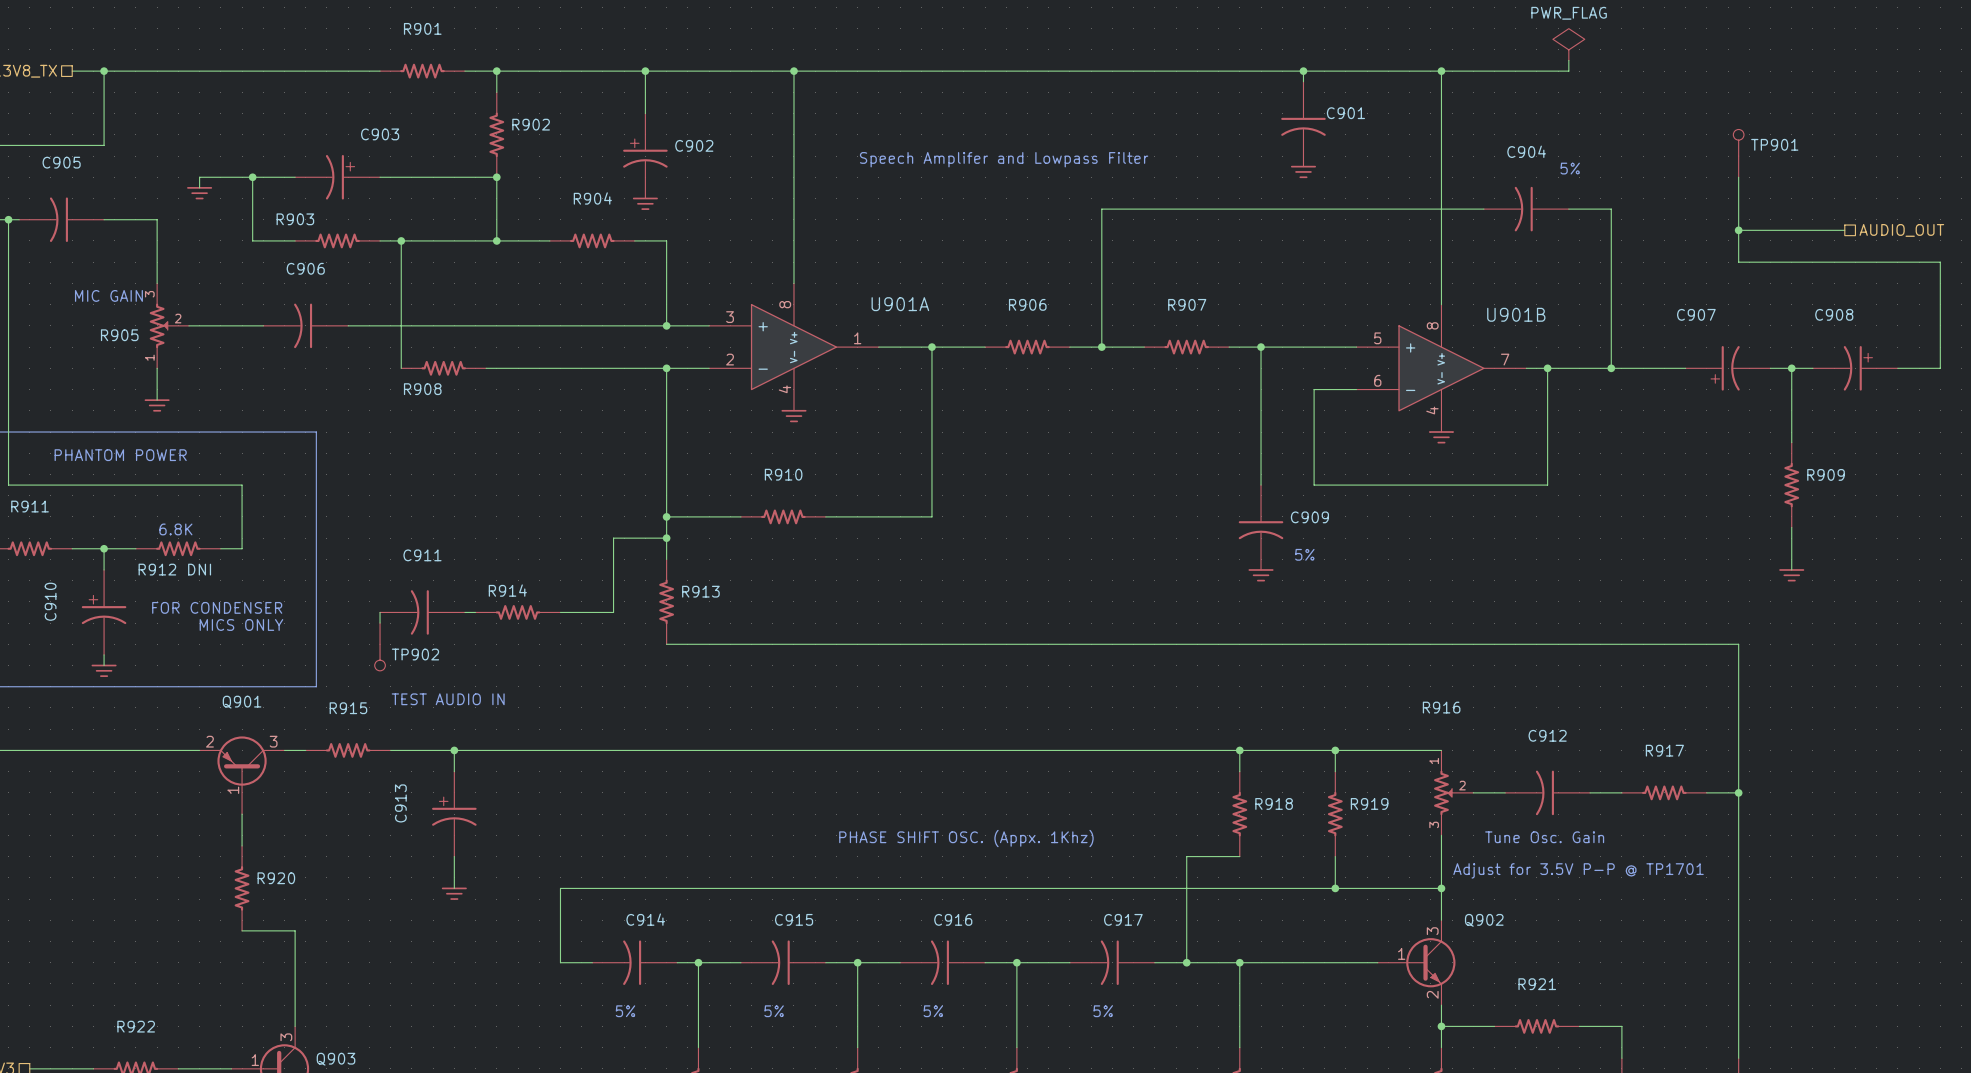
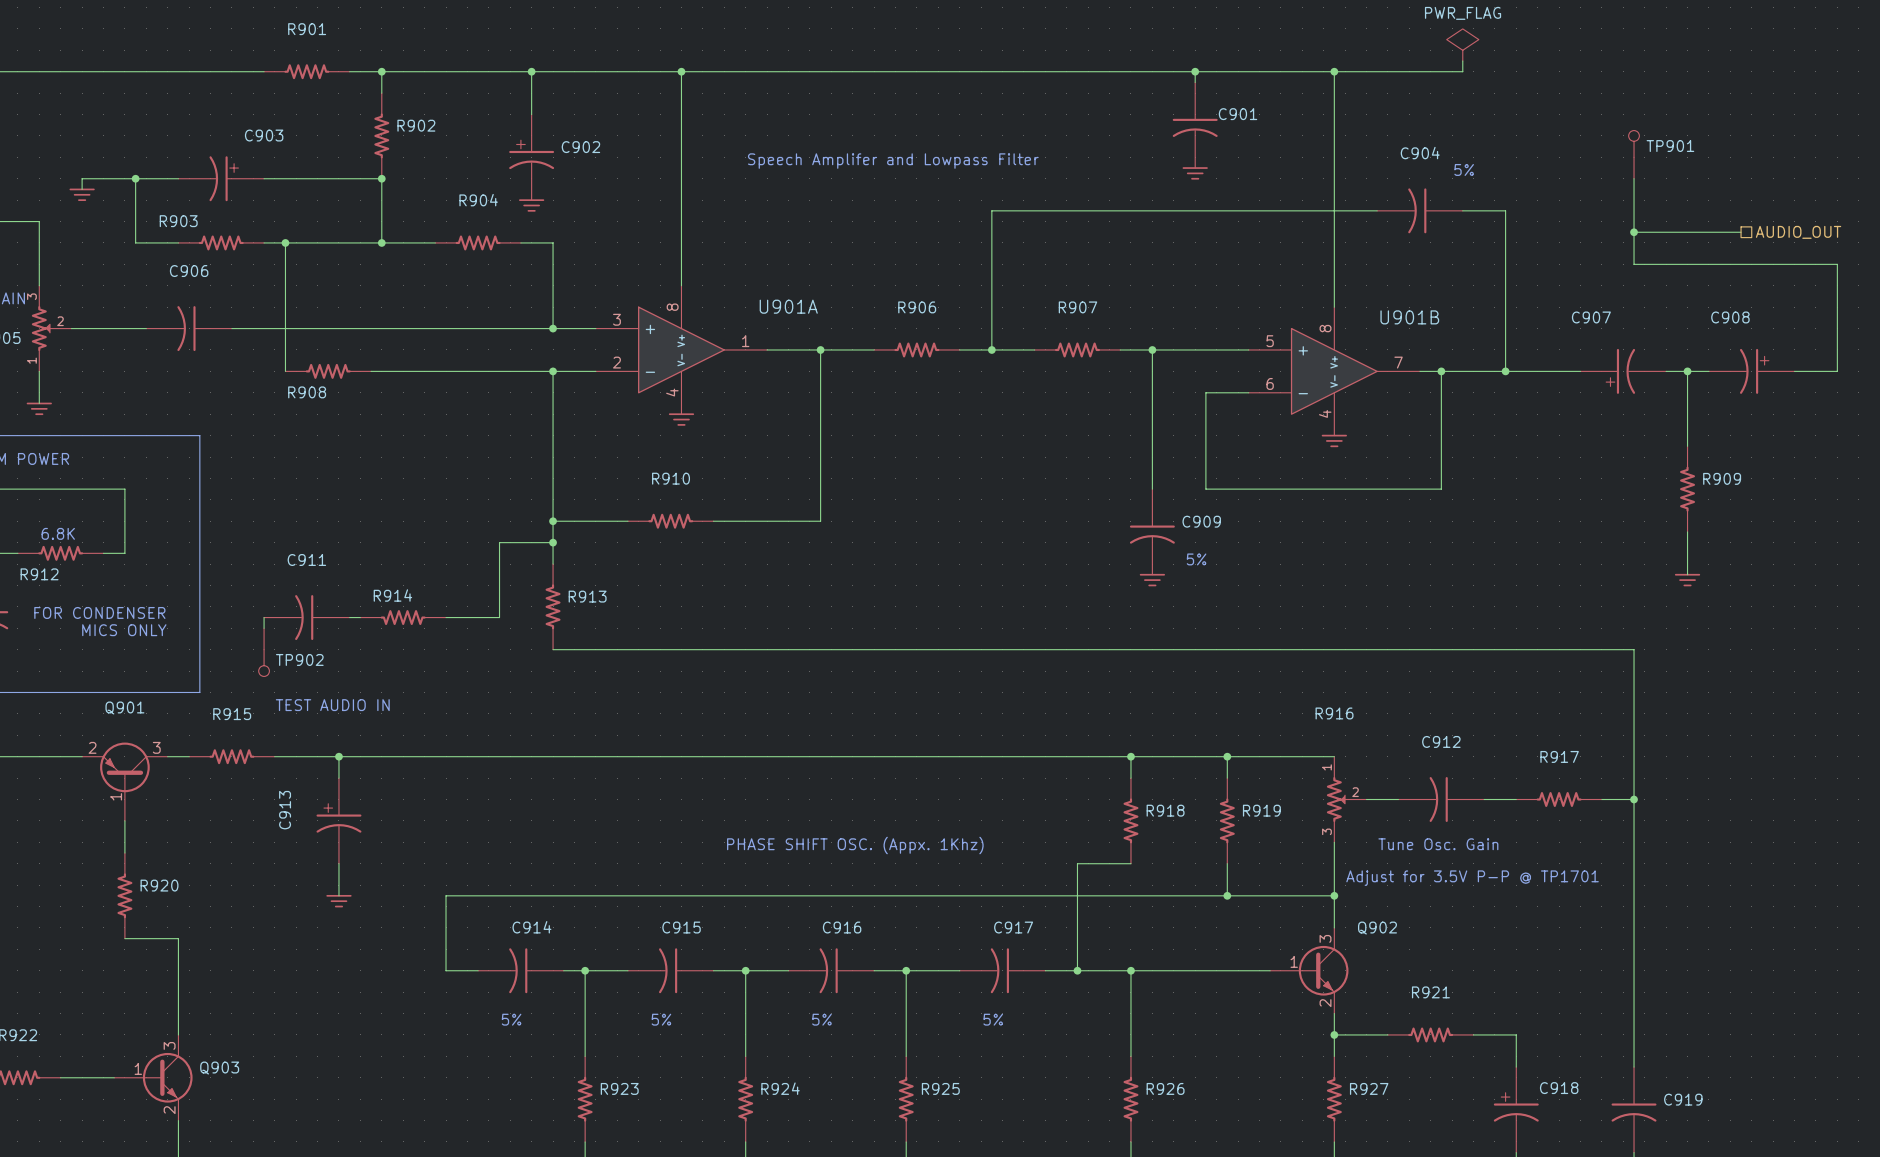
R912 value: DNI (199, 569) -> none

